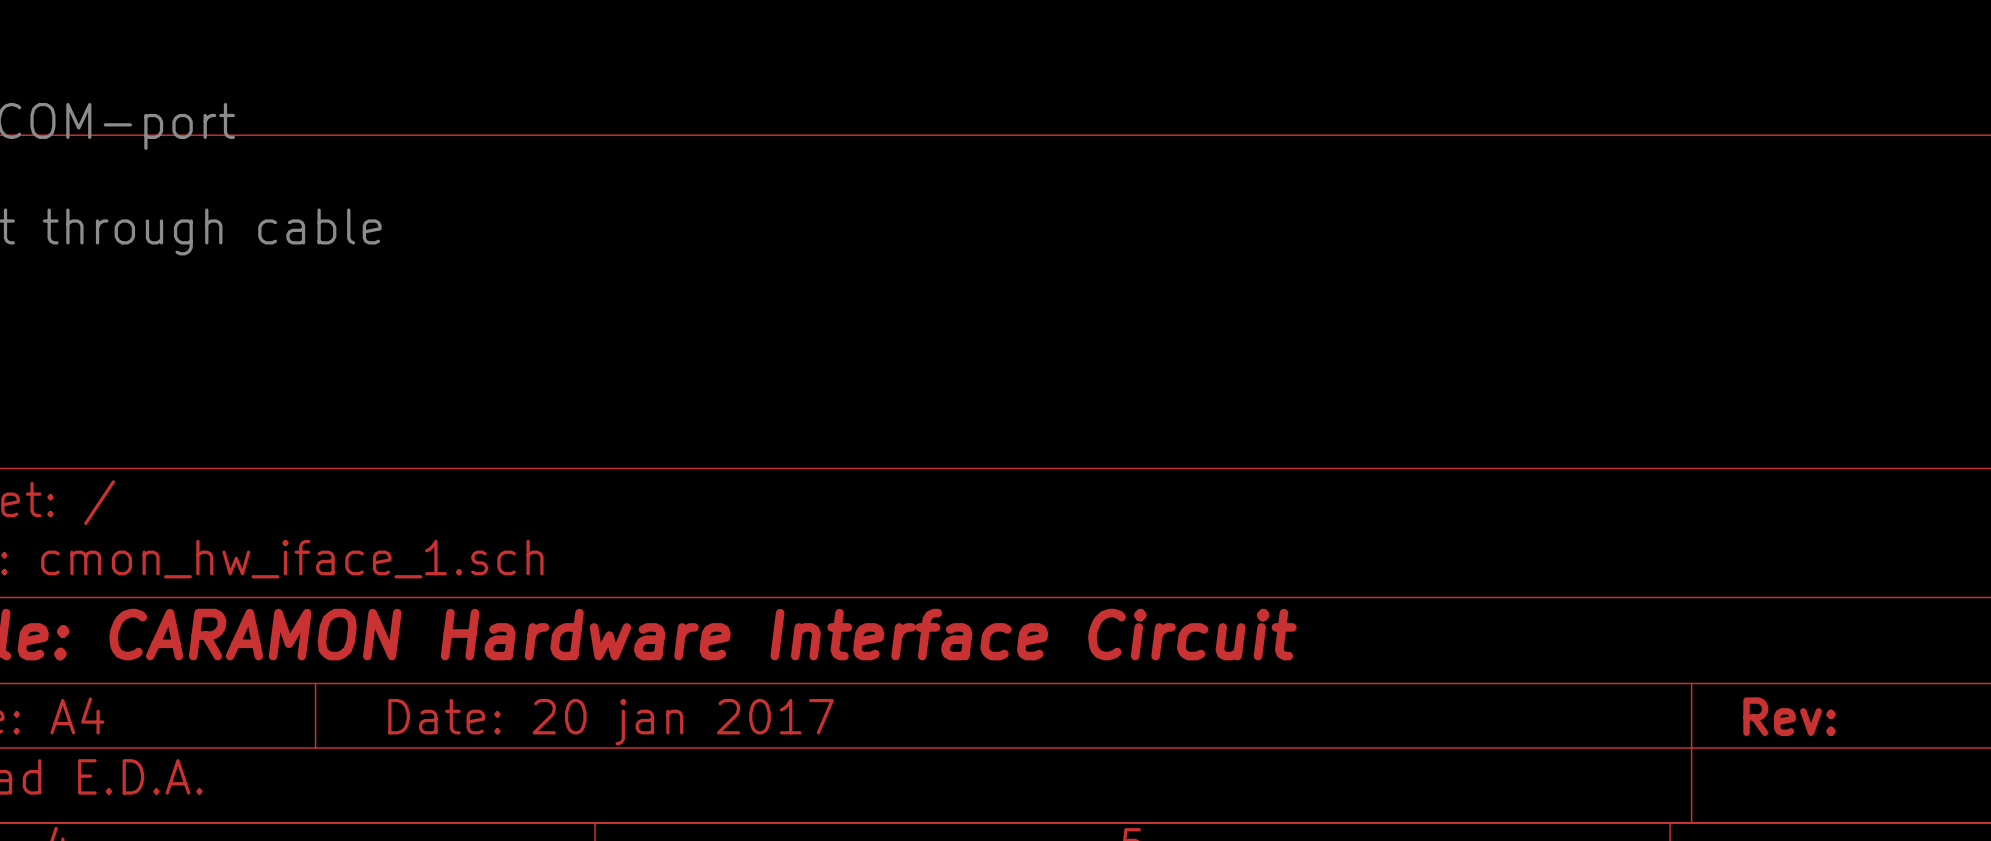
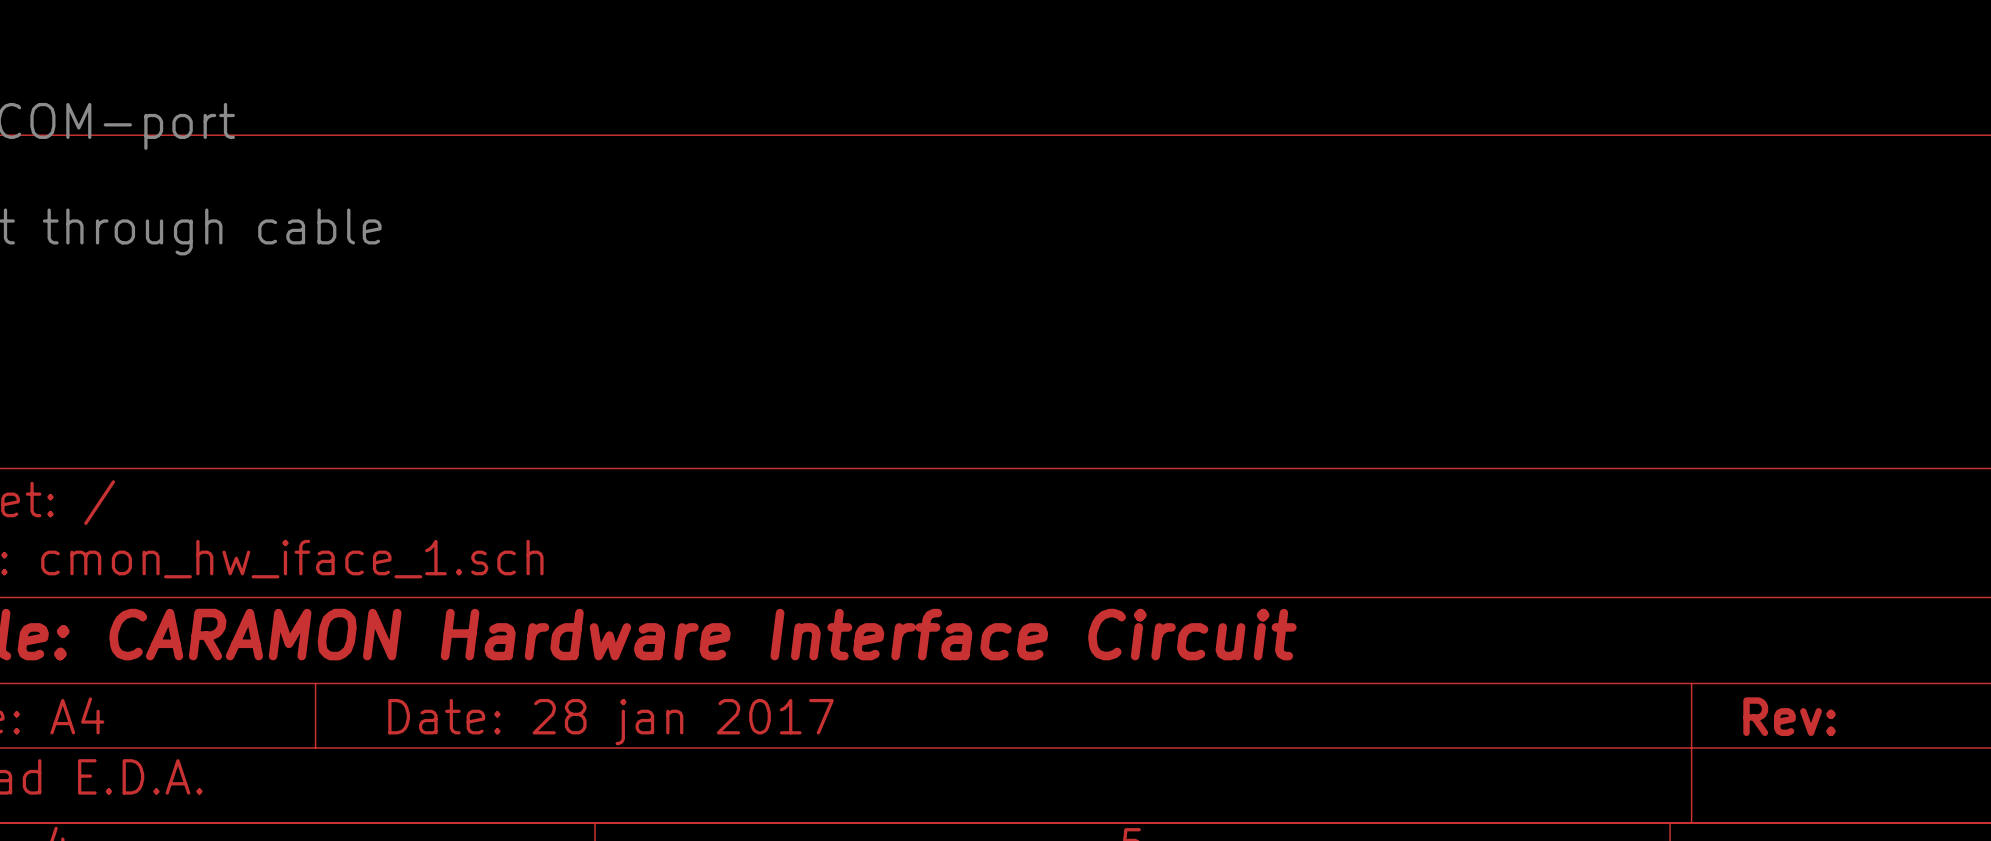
title block: Date: 20 jan 2017 (611, 722) -> Date: 28 jan 2017 (611, 722)

